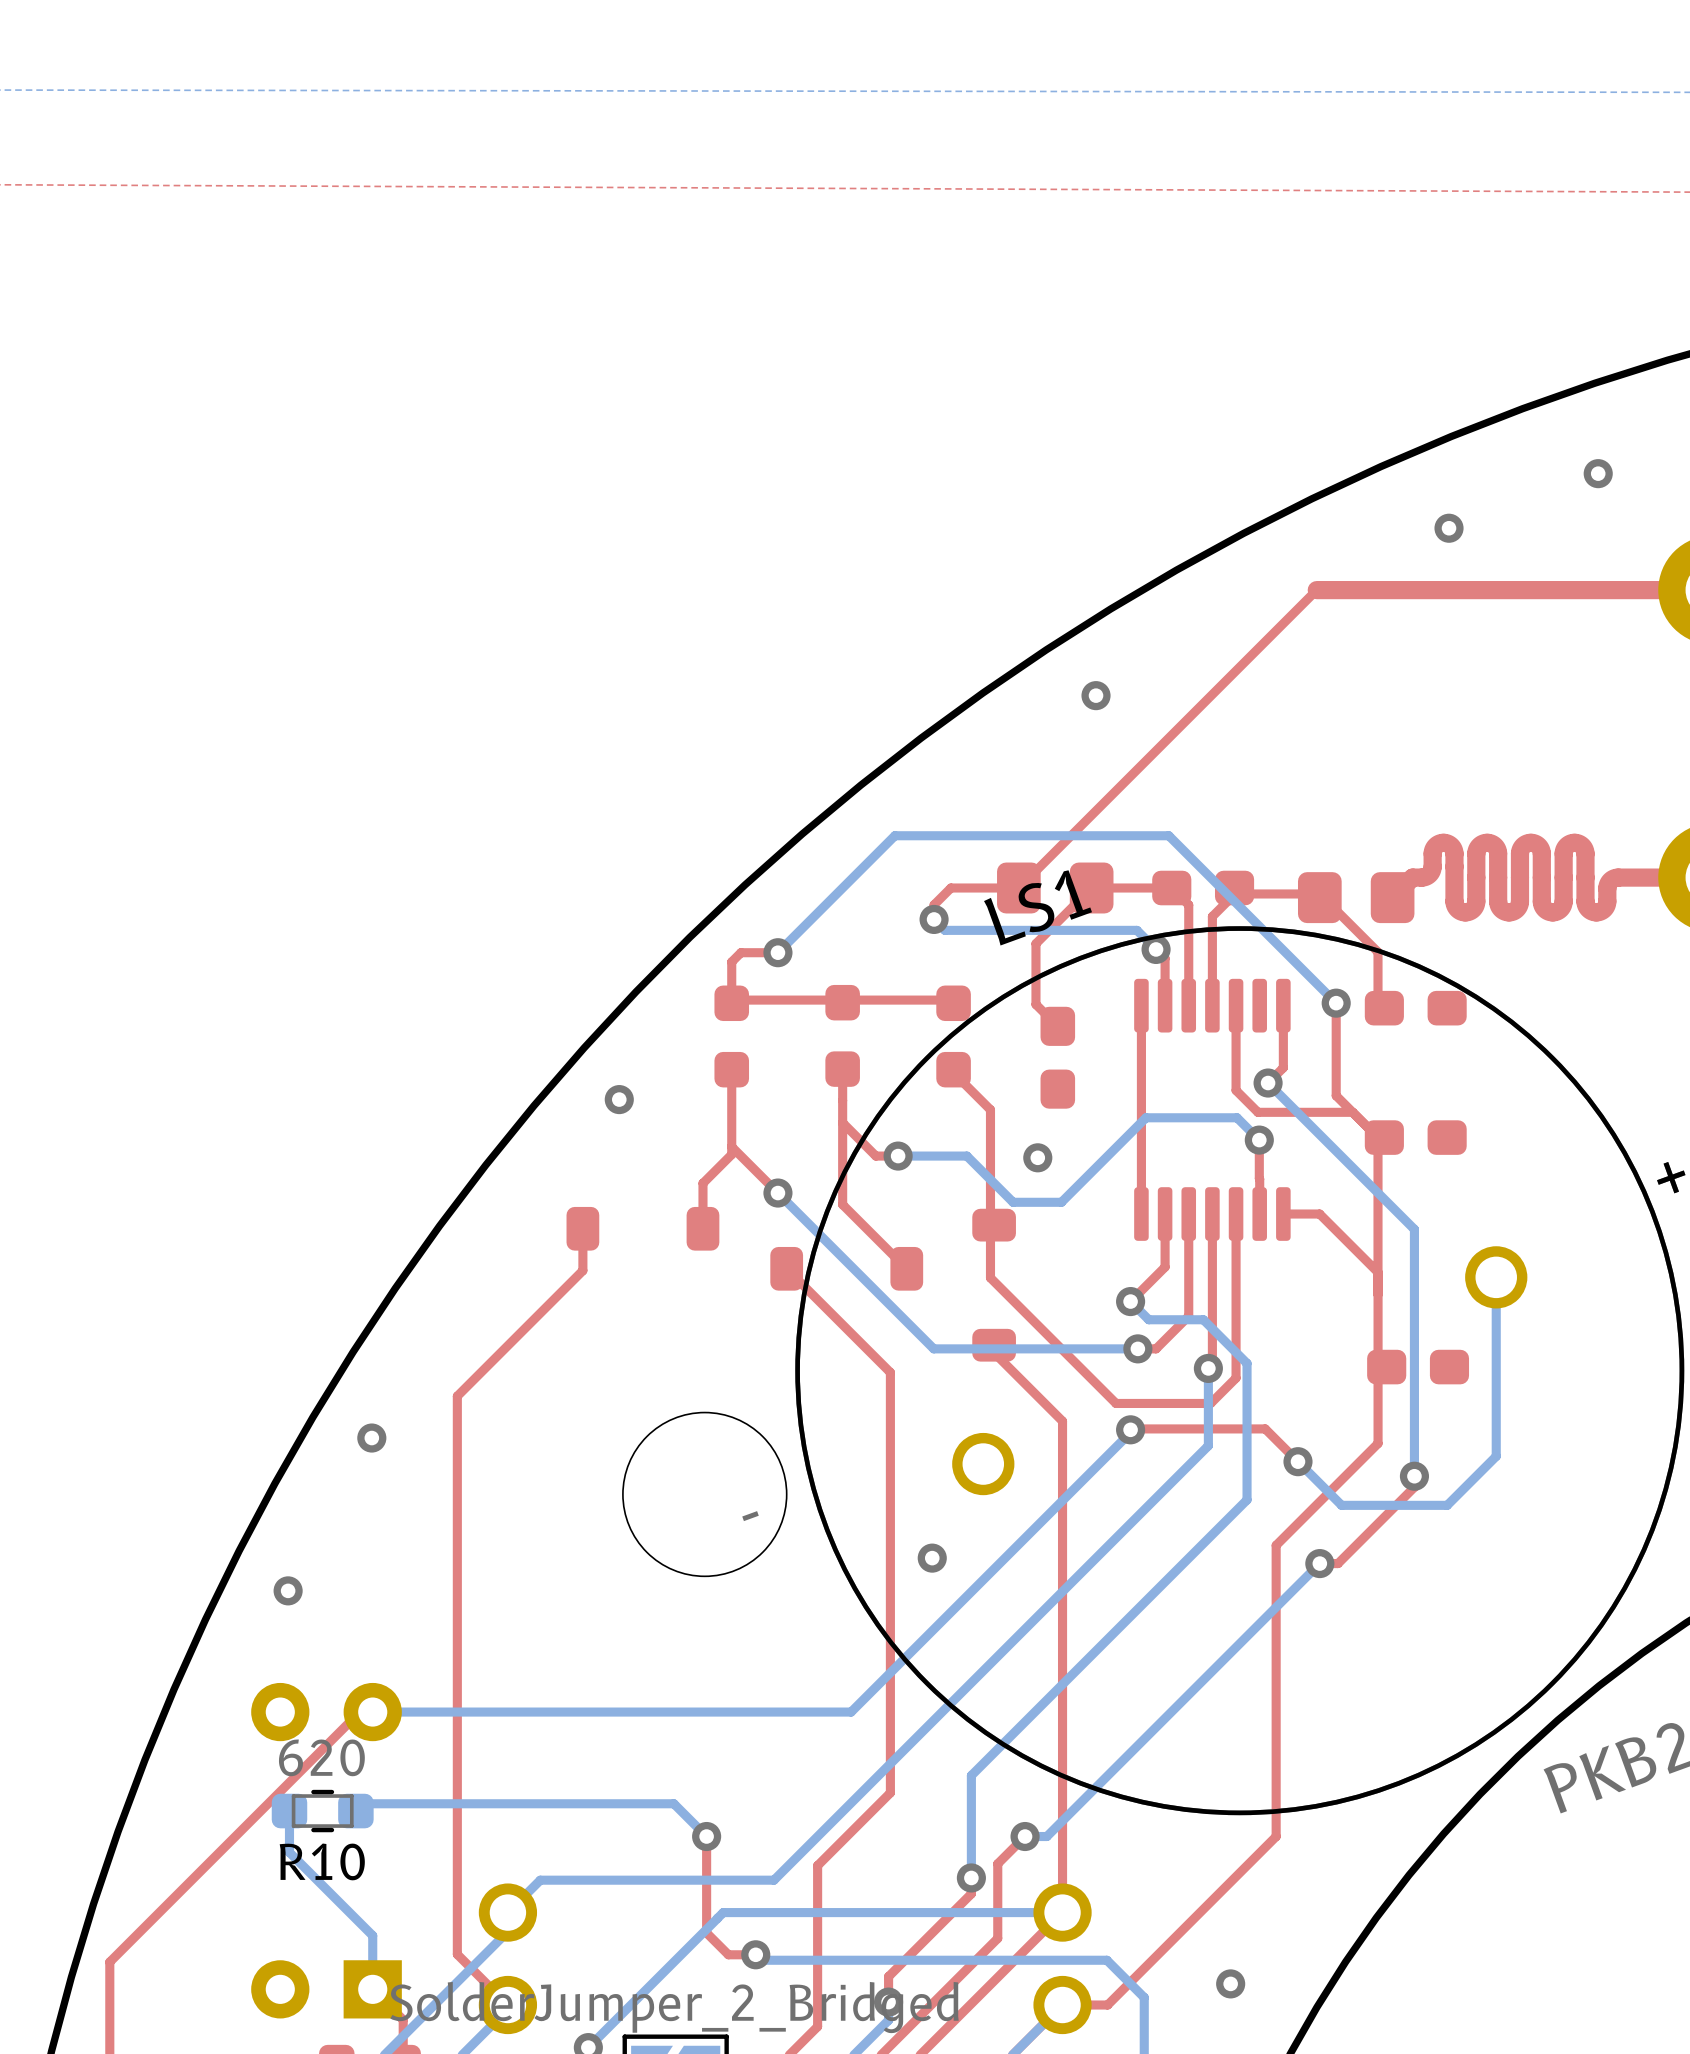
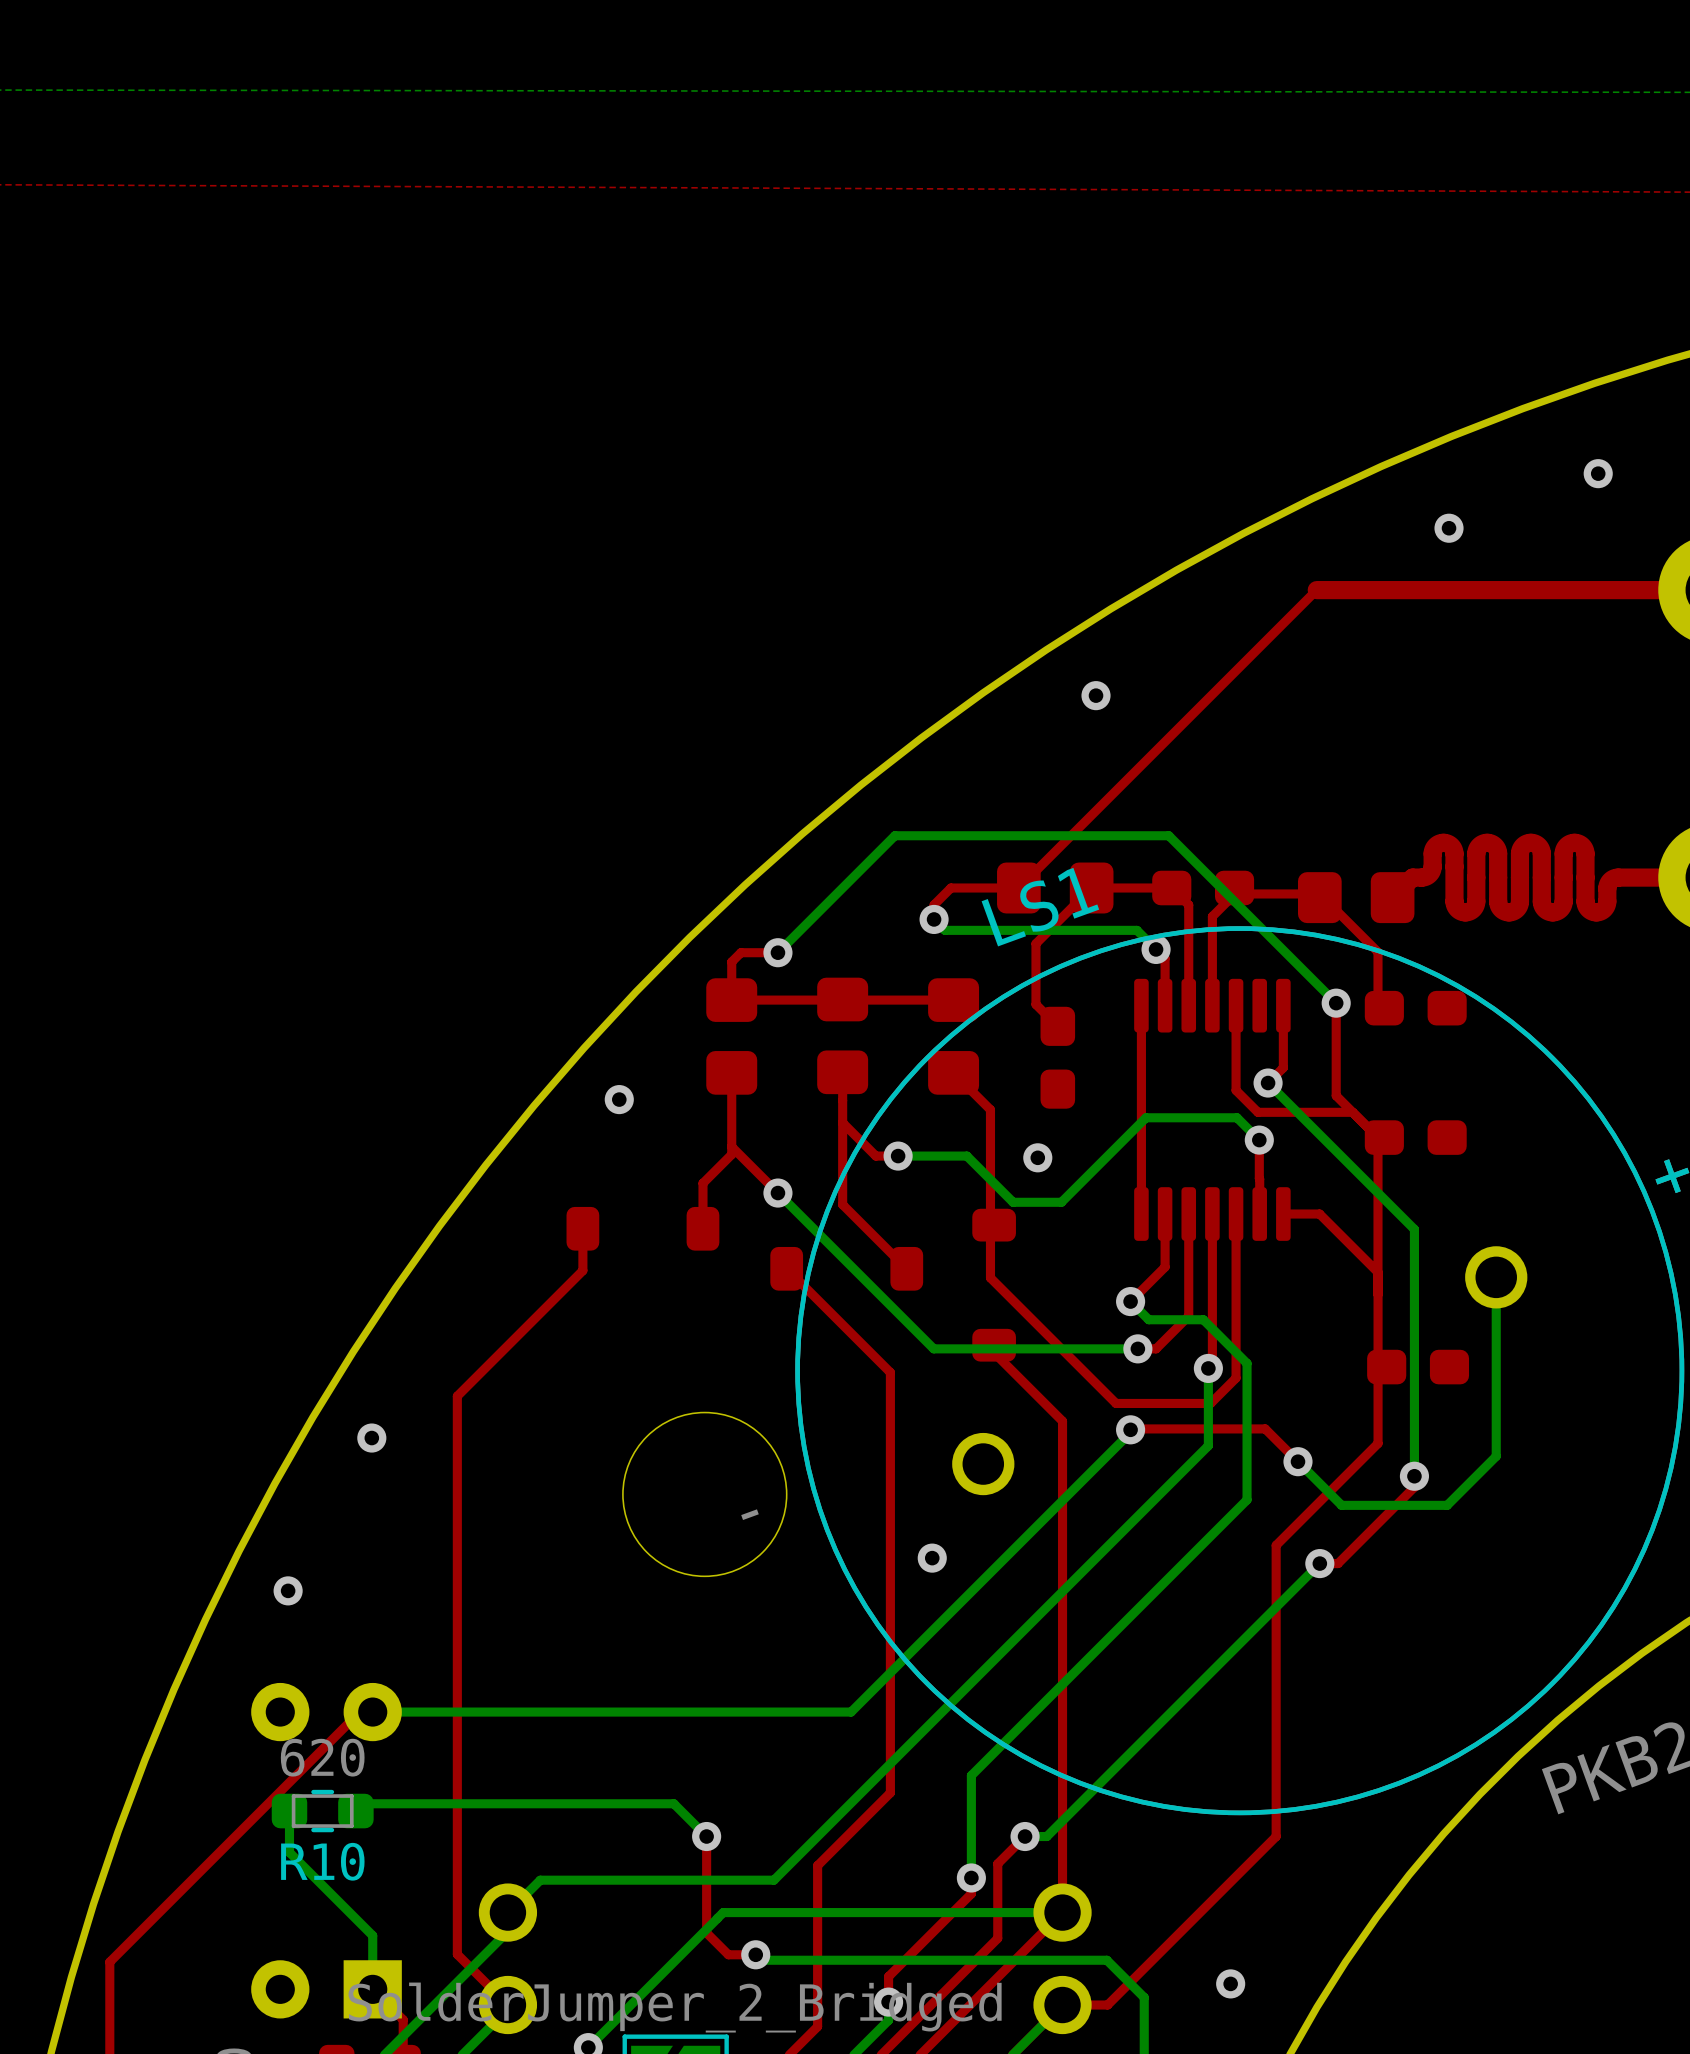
part footprint: [825, 984, 860, 1087] -> [817, 977, 869, 1095]
part footprint: [714, 985, 750, 1088] -> [706, 978, 758, 1095]
part footprint: [936, 985, 971, 1088] -> [928, 978, 980, 1095]

